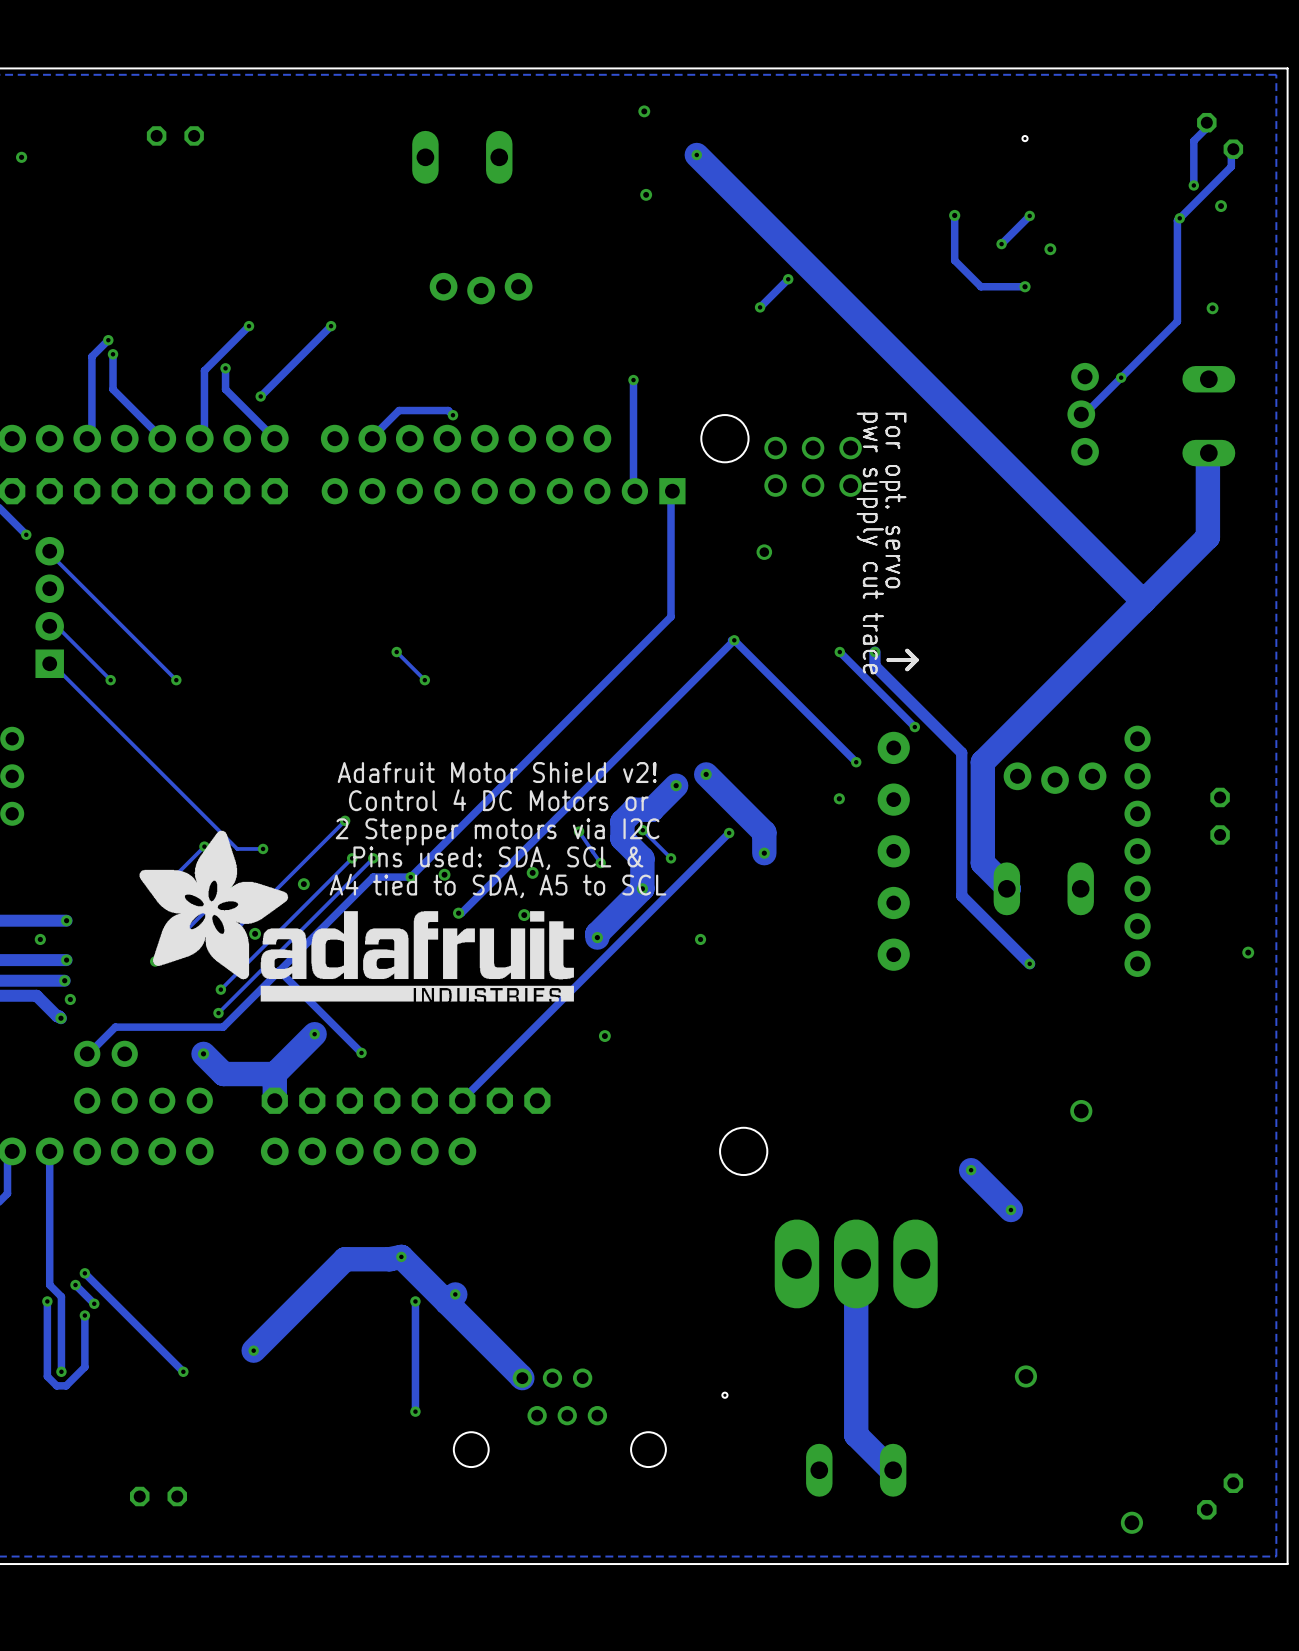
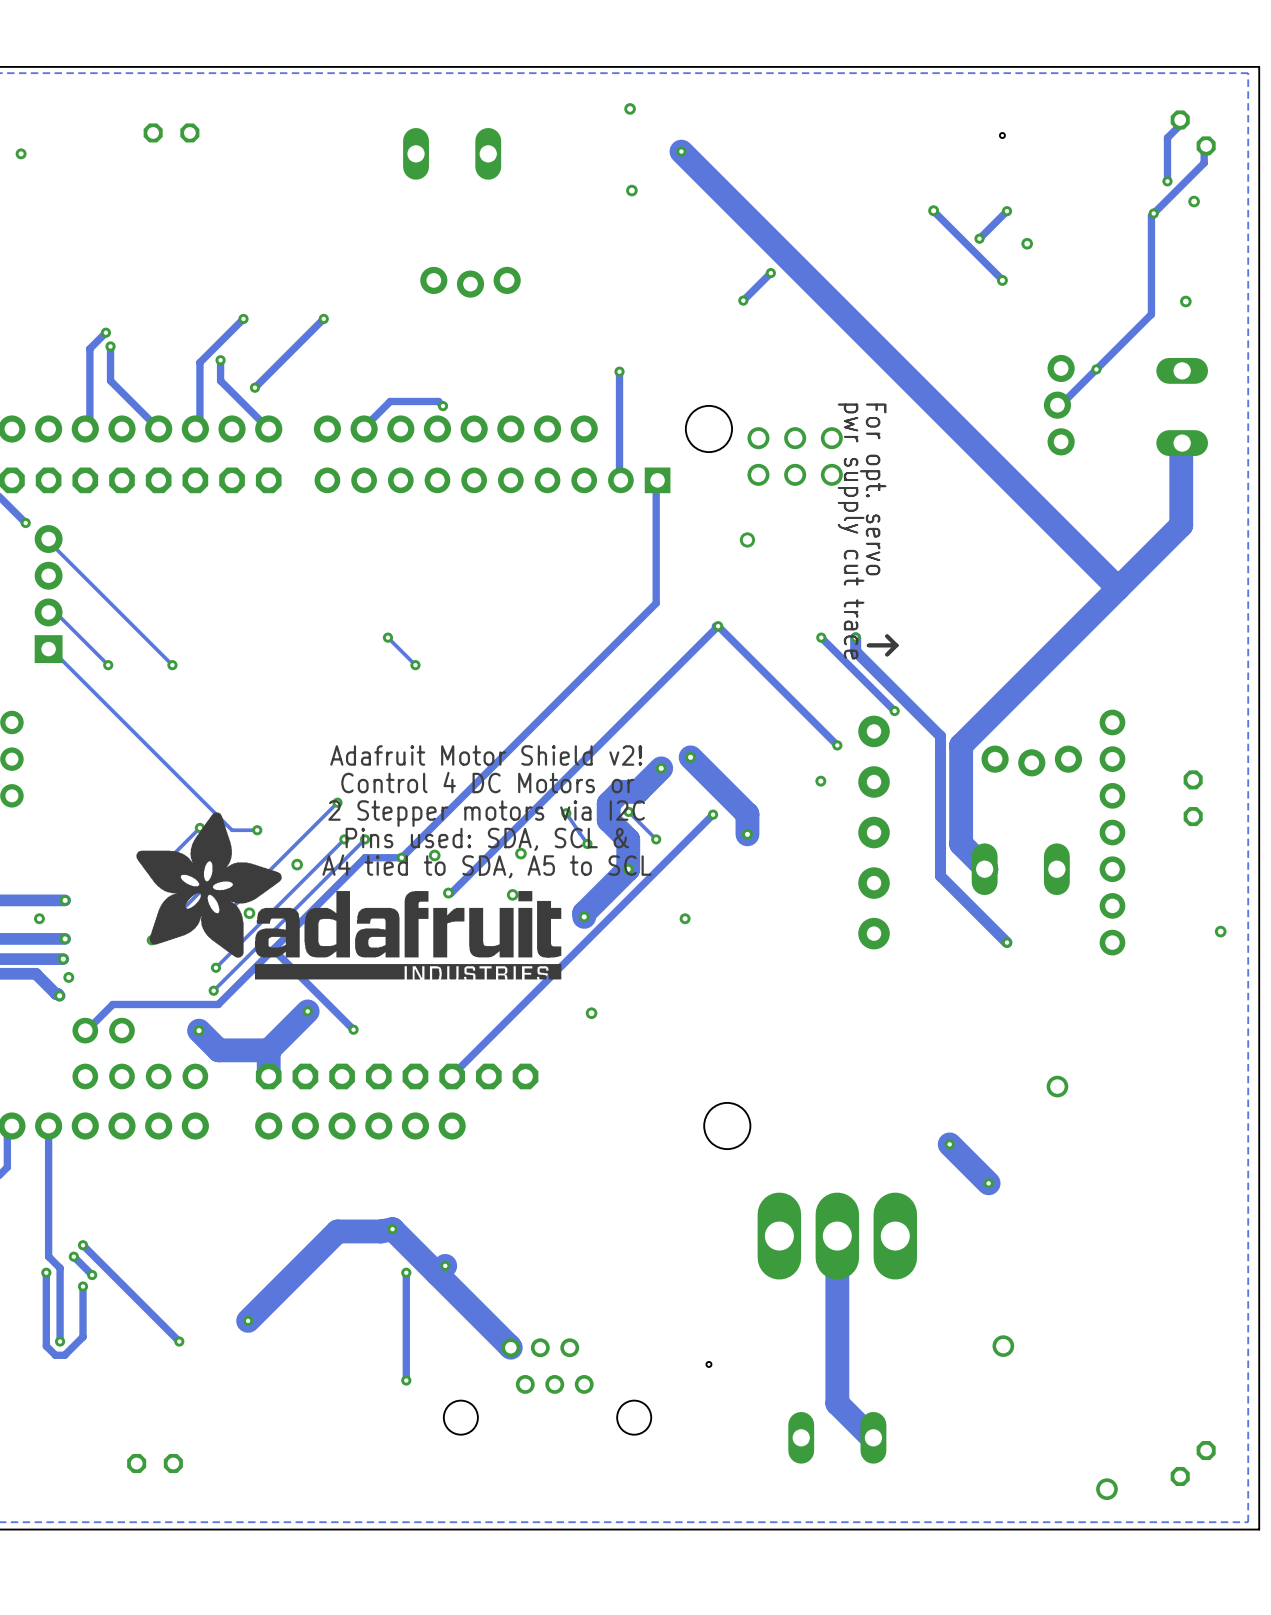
track: (954, 215) (954, 260) (980, 286) (1025, 286) -> (933, 211) (1002, 279)

